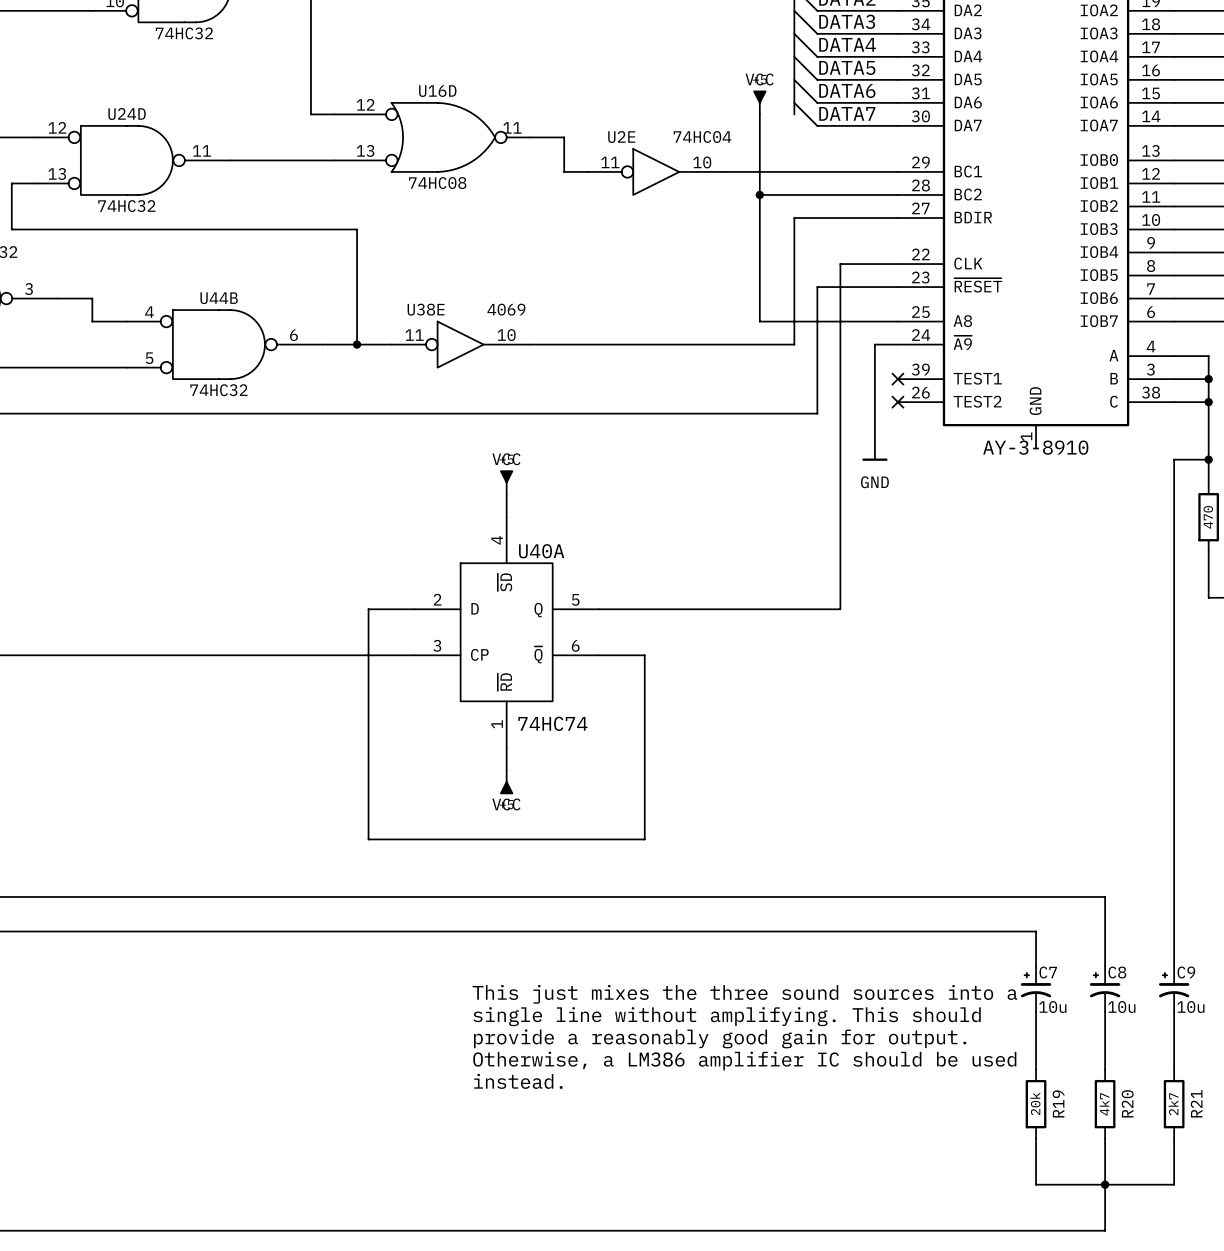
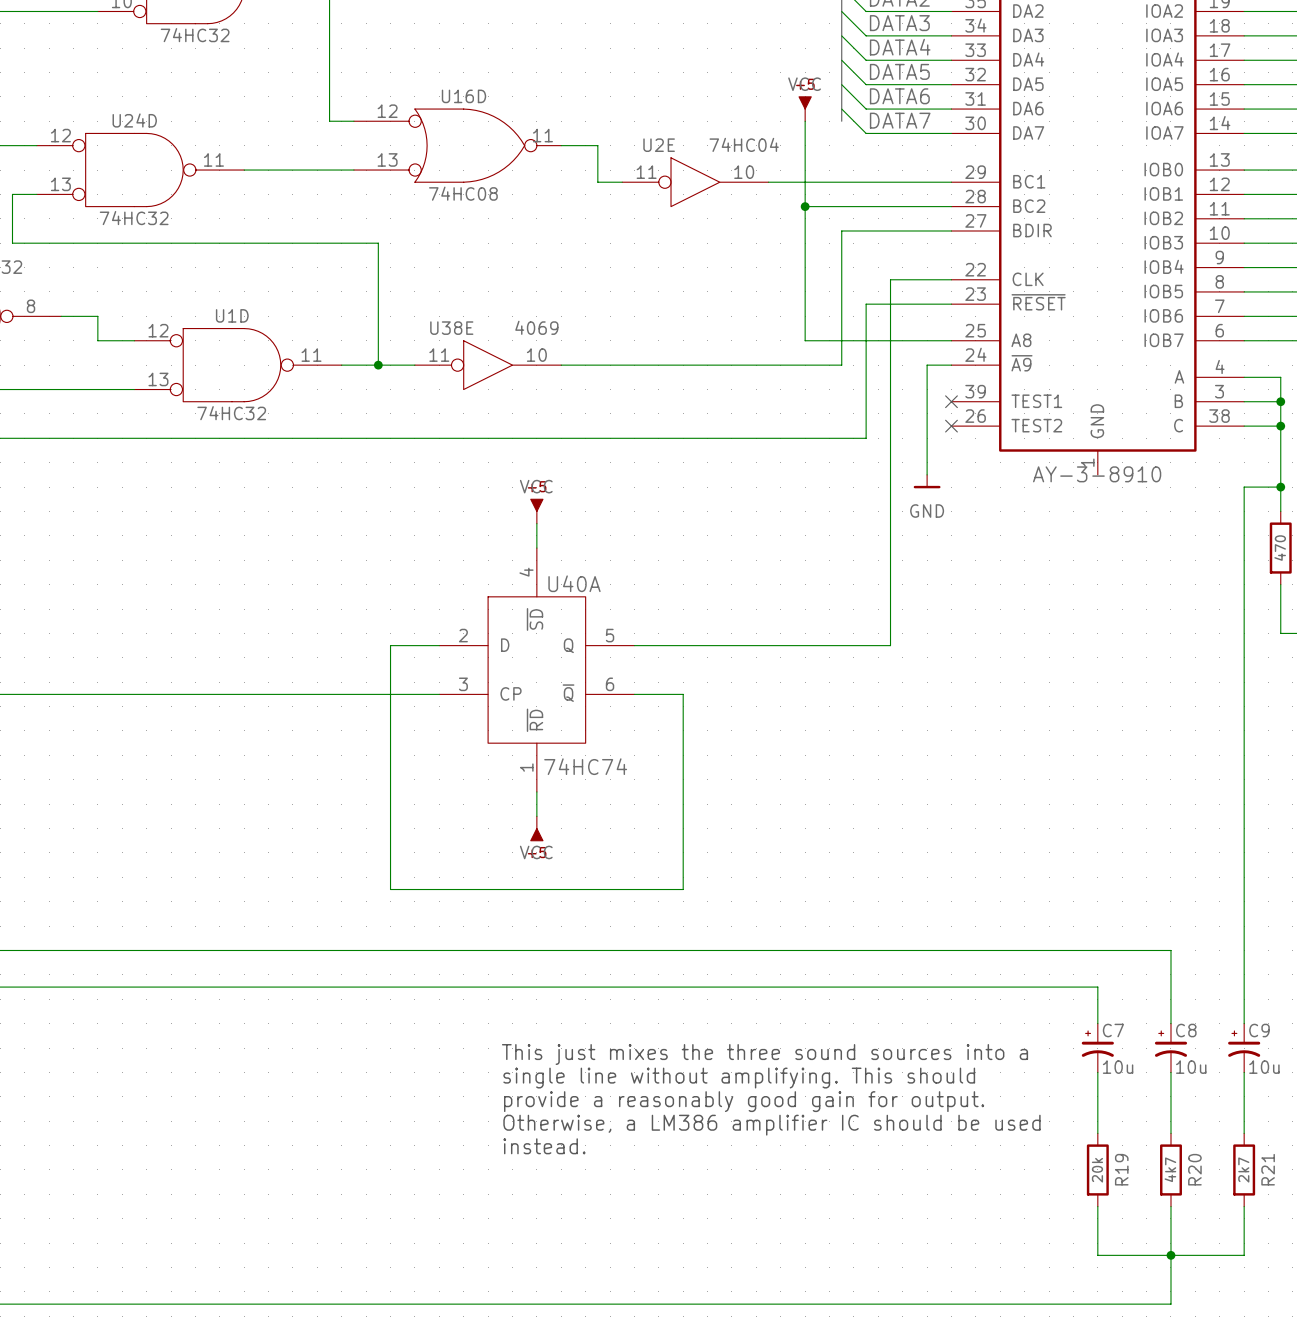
part pin number: 3 (29, 289) -> 8 (31, 306)
U44B name: U44B (219, 298) -> U1D (232, 315)
U44B pin number: 4 (149, 312) -> 12 (158, 330)
U44B pin number: 6 (293, 335) -> 11 (311, 355)
U44B pin number: 5 (149, 358) -> 13 (158, 379)

